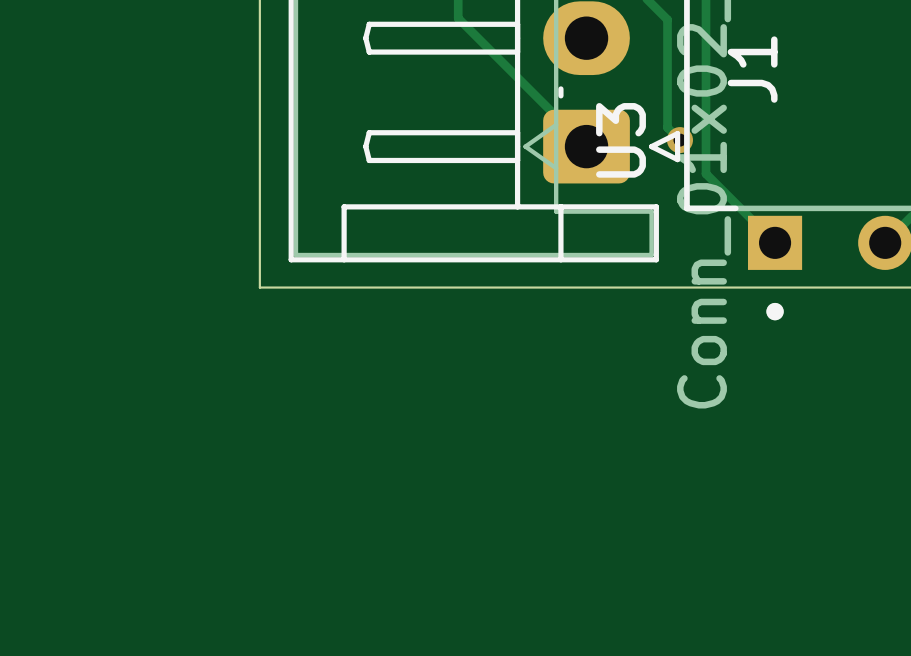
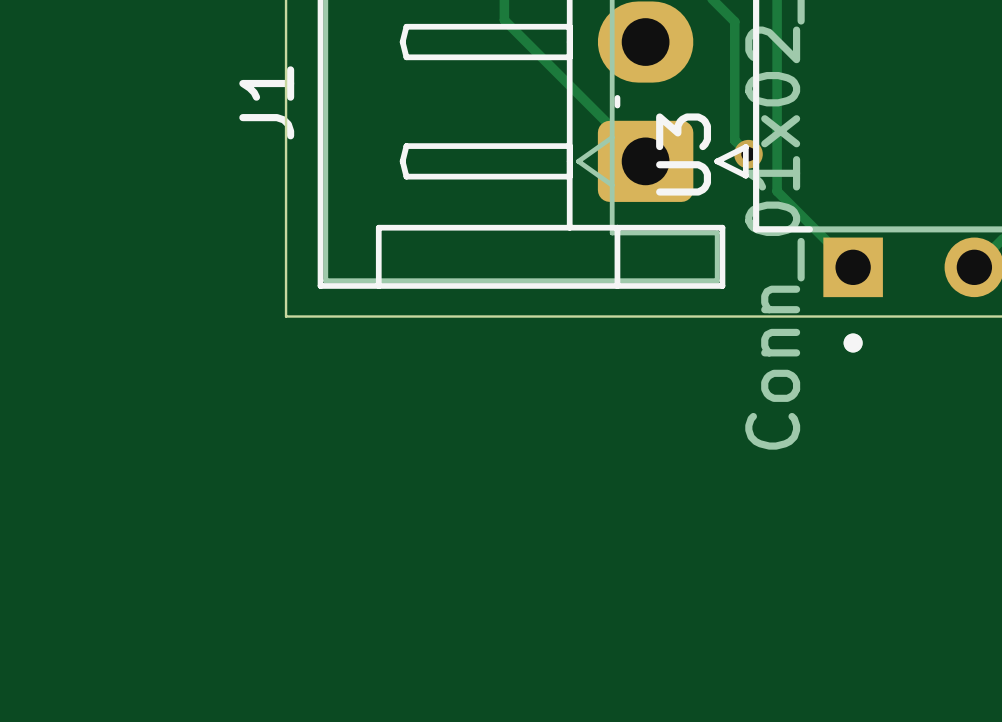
J1 name position: J1 (752, 69) -> J1 (266, 102)

